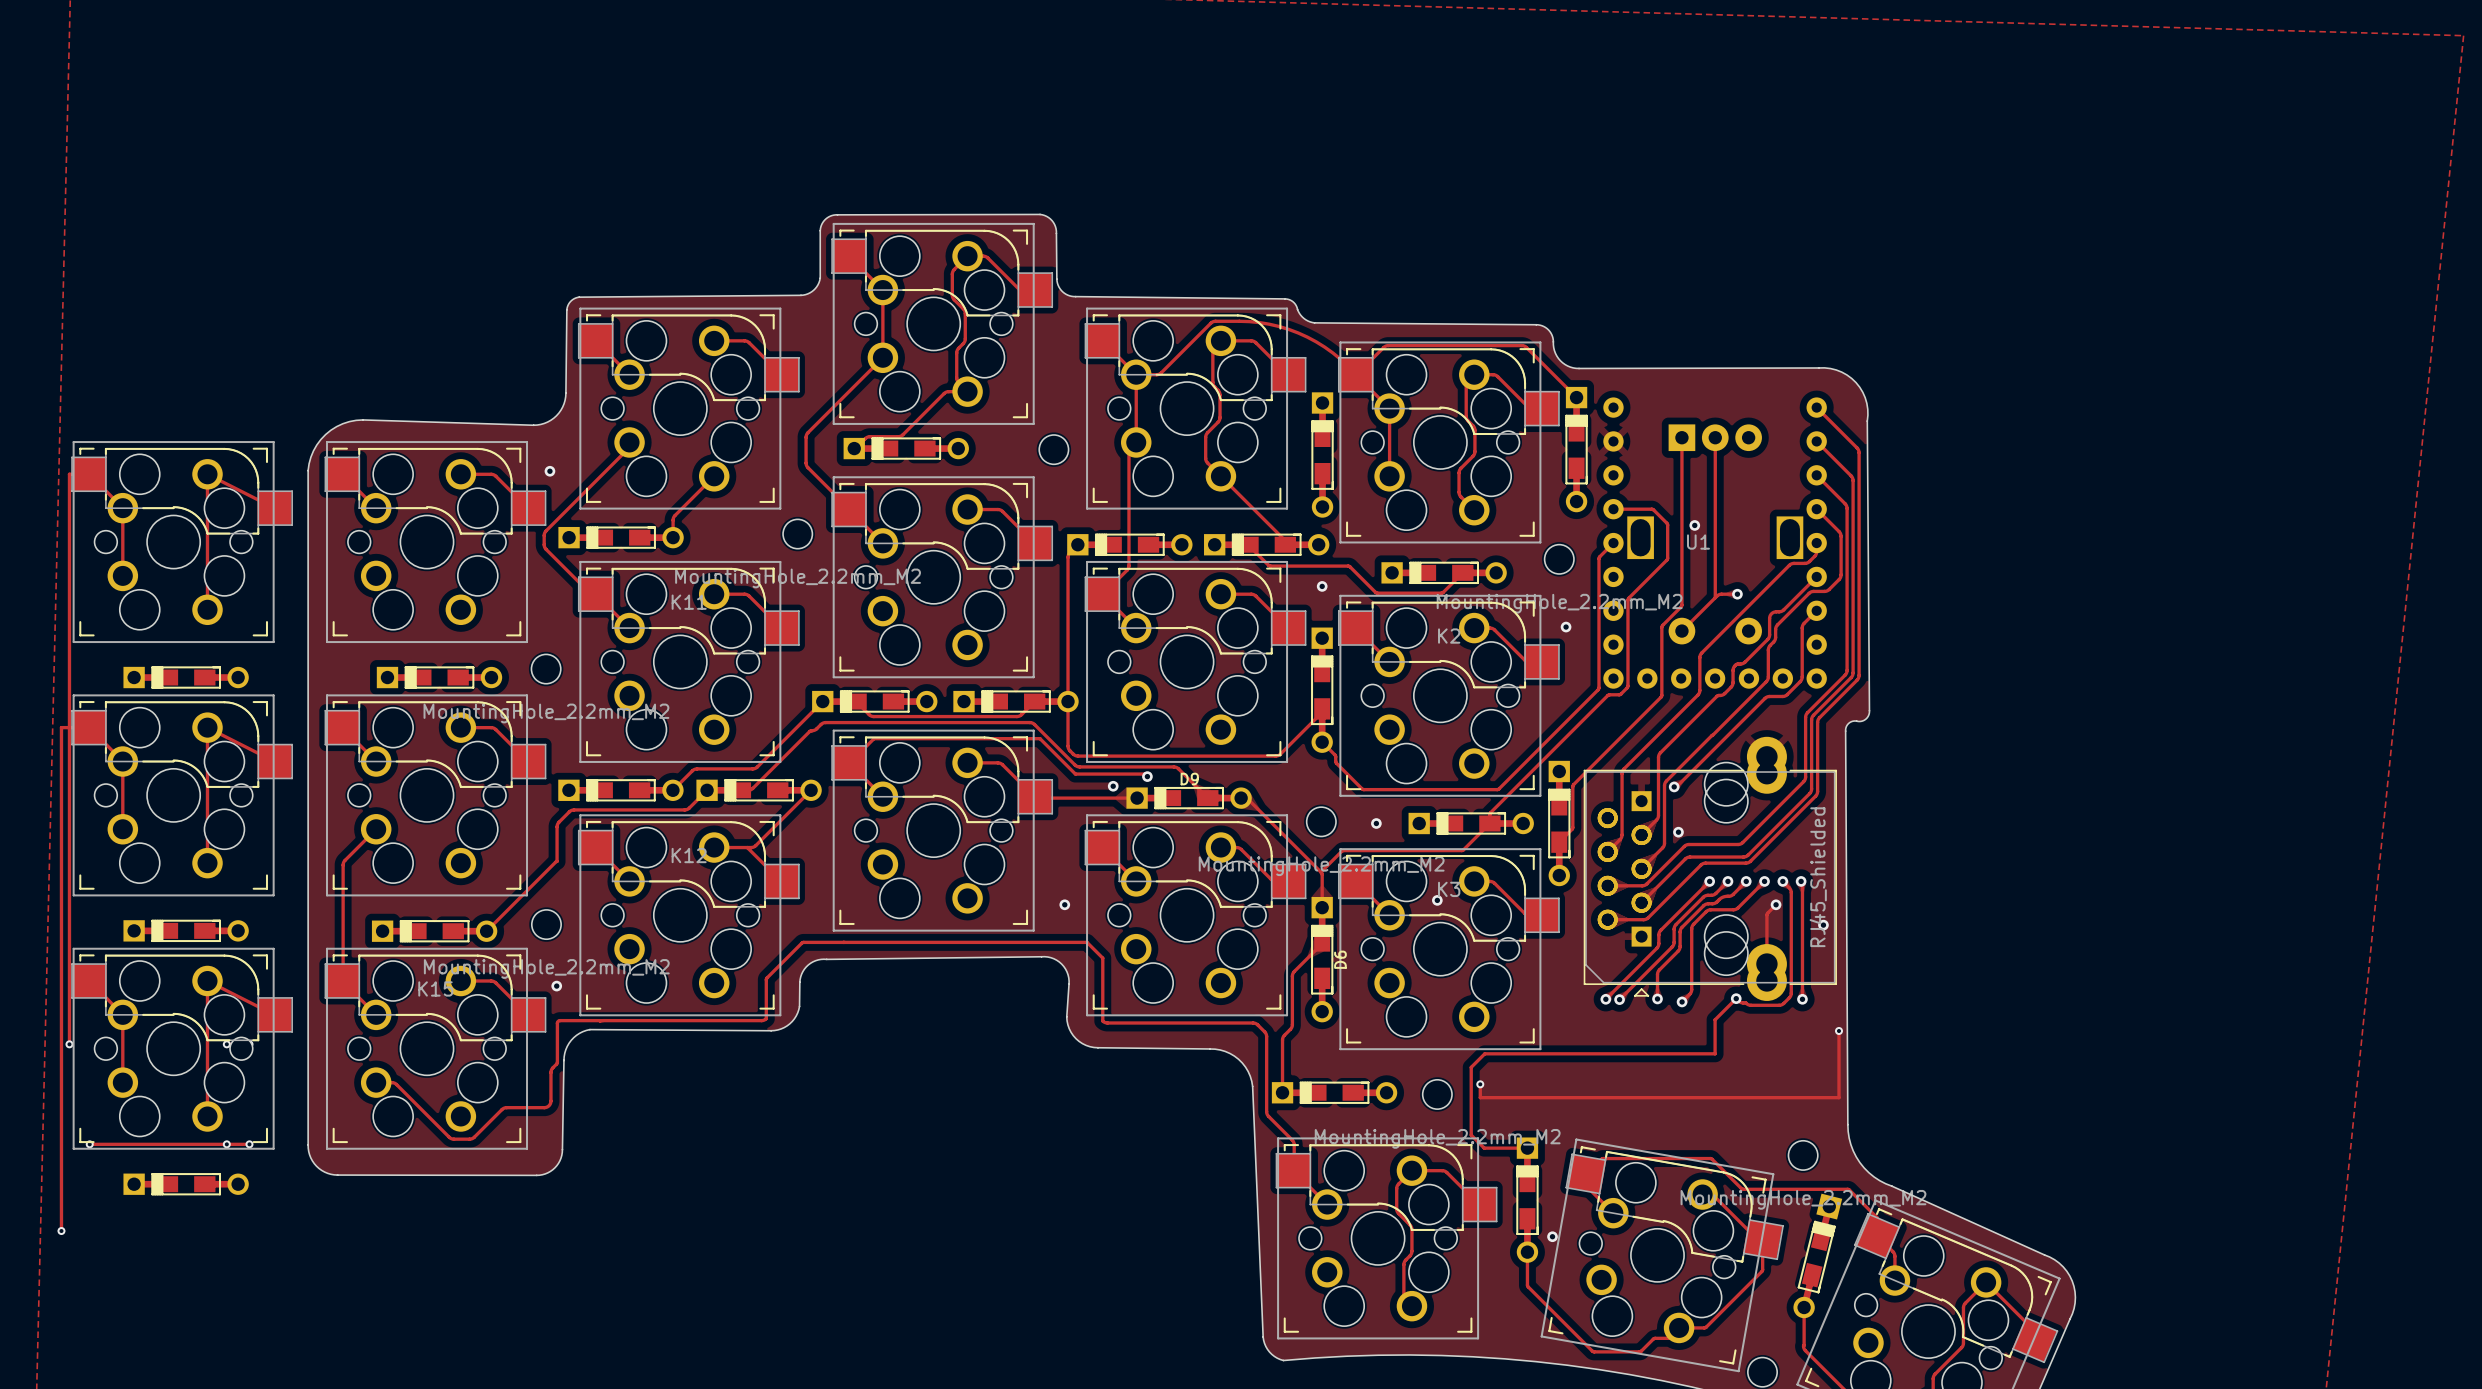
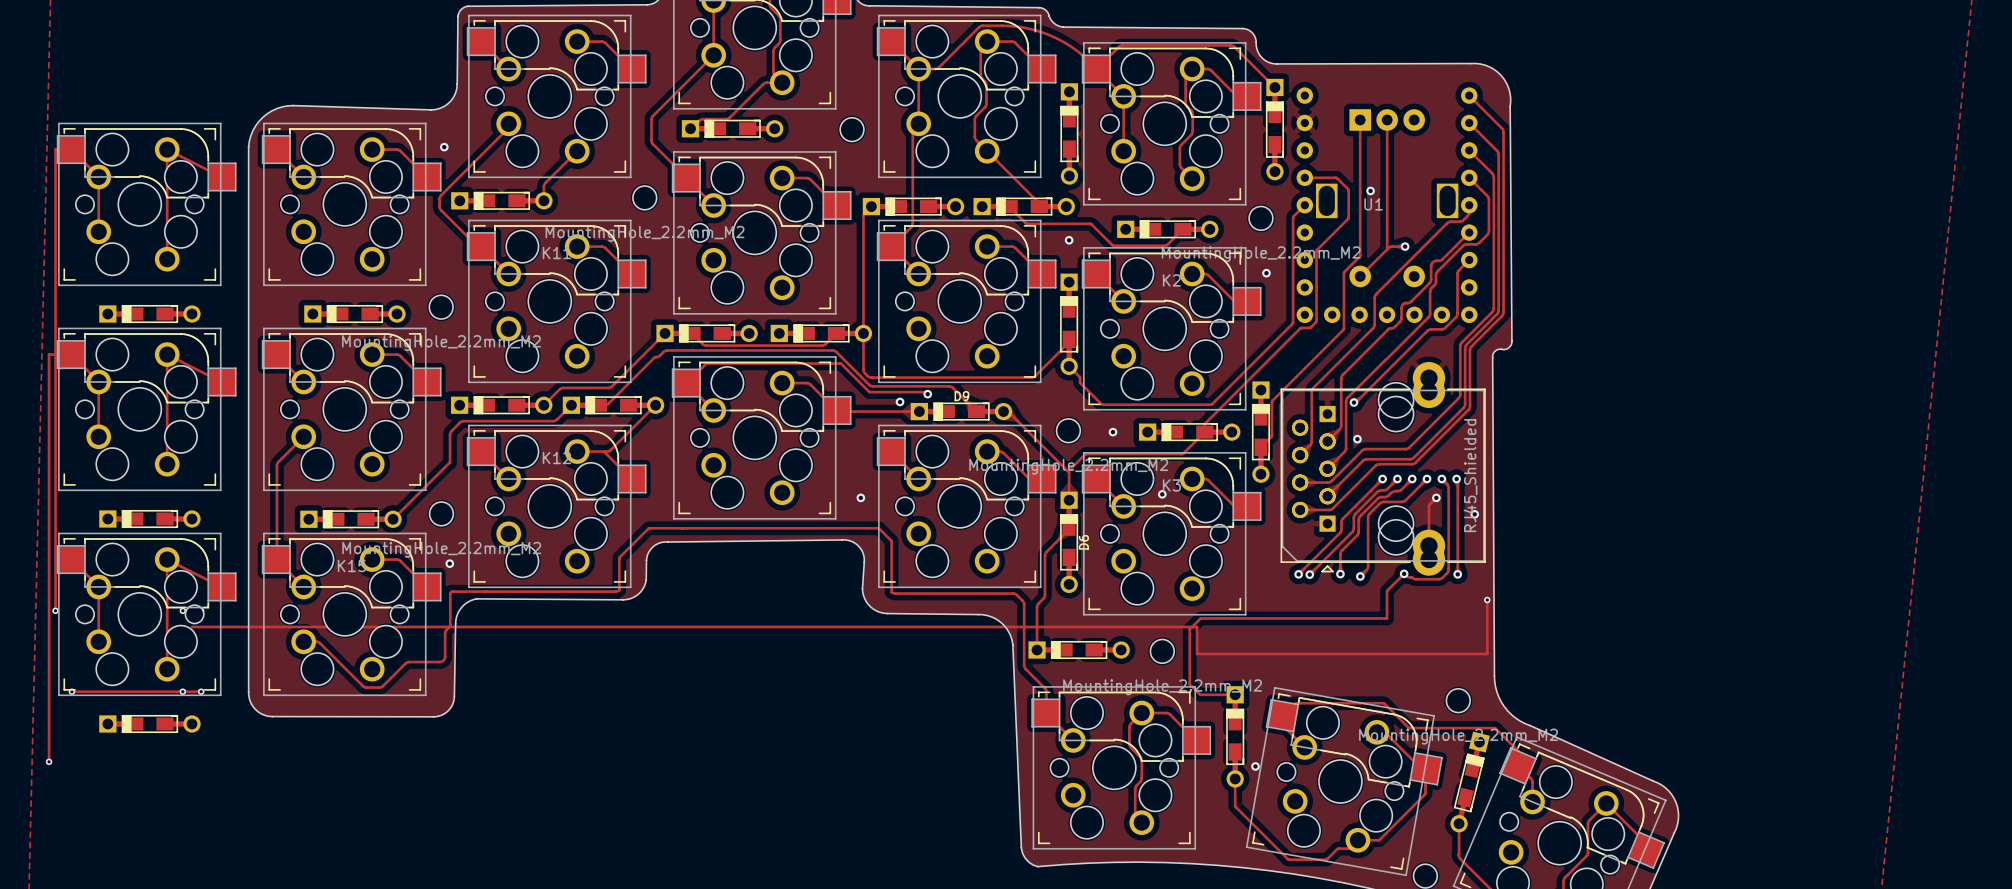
track: none -> (192, 626) (1197, 626) (1197, 643)
via: (1480, 1084) -> none

